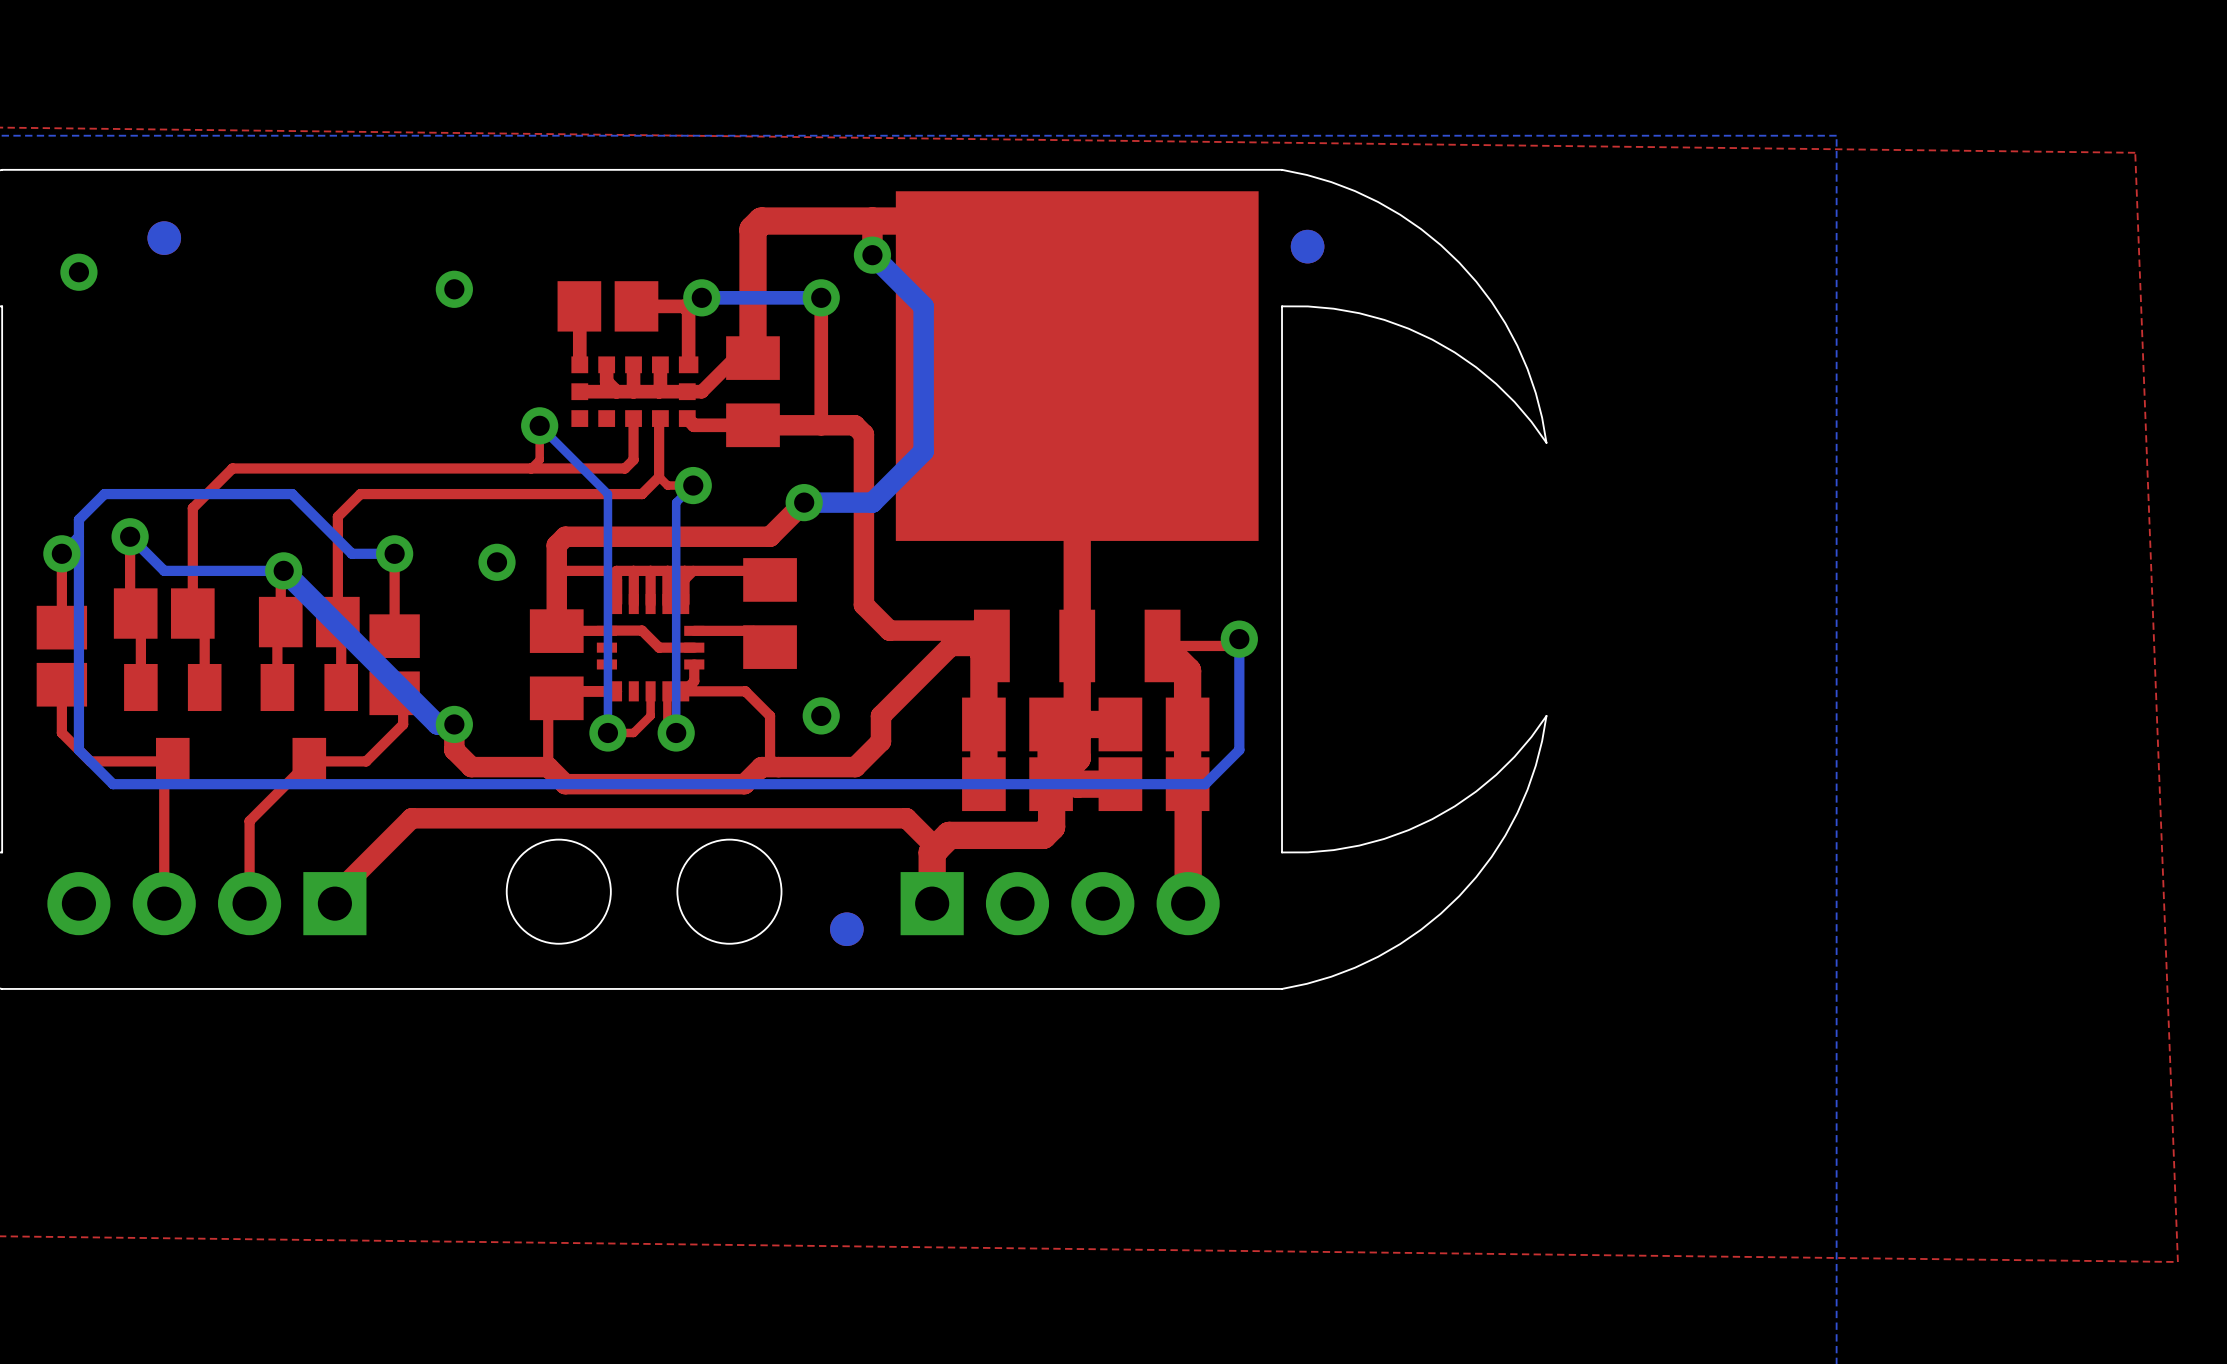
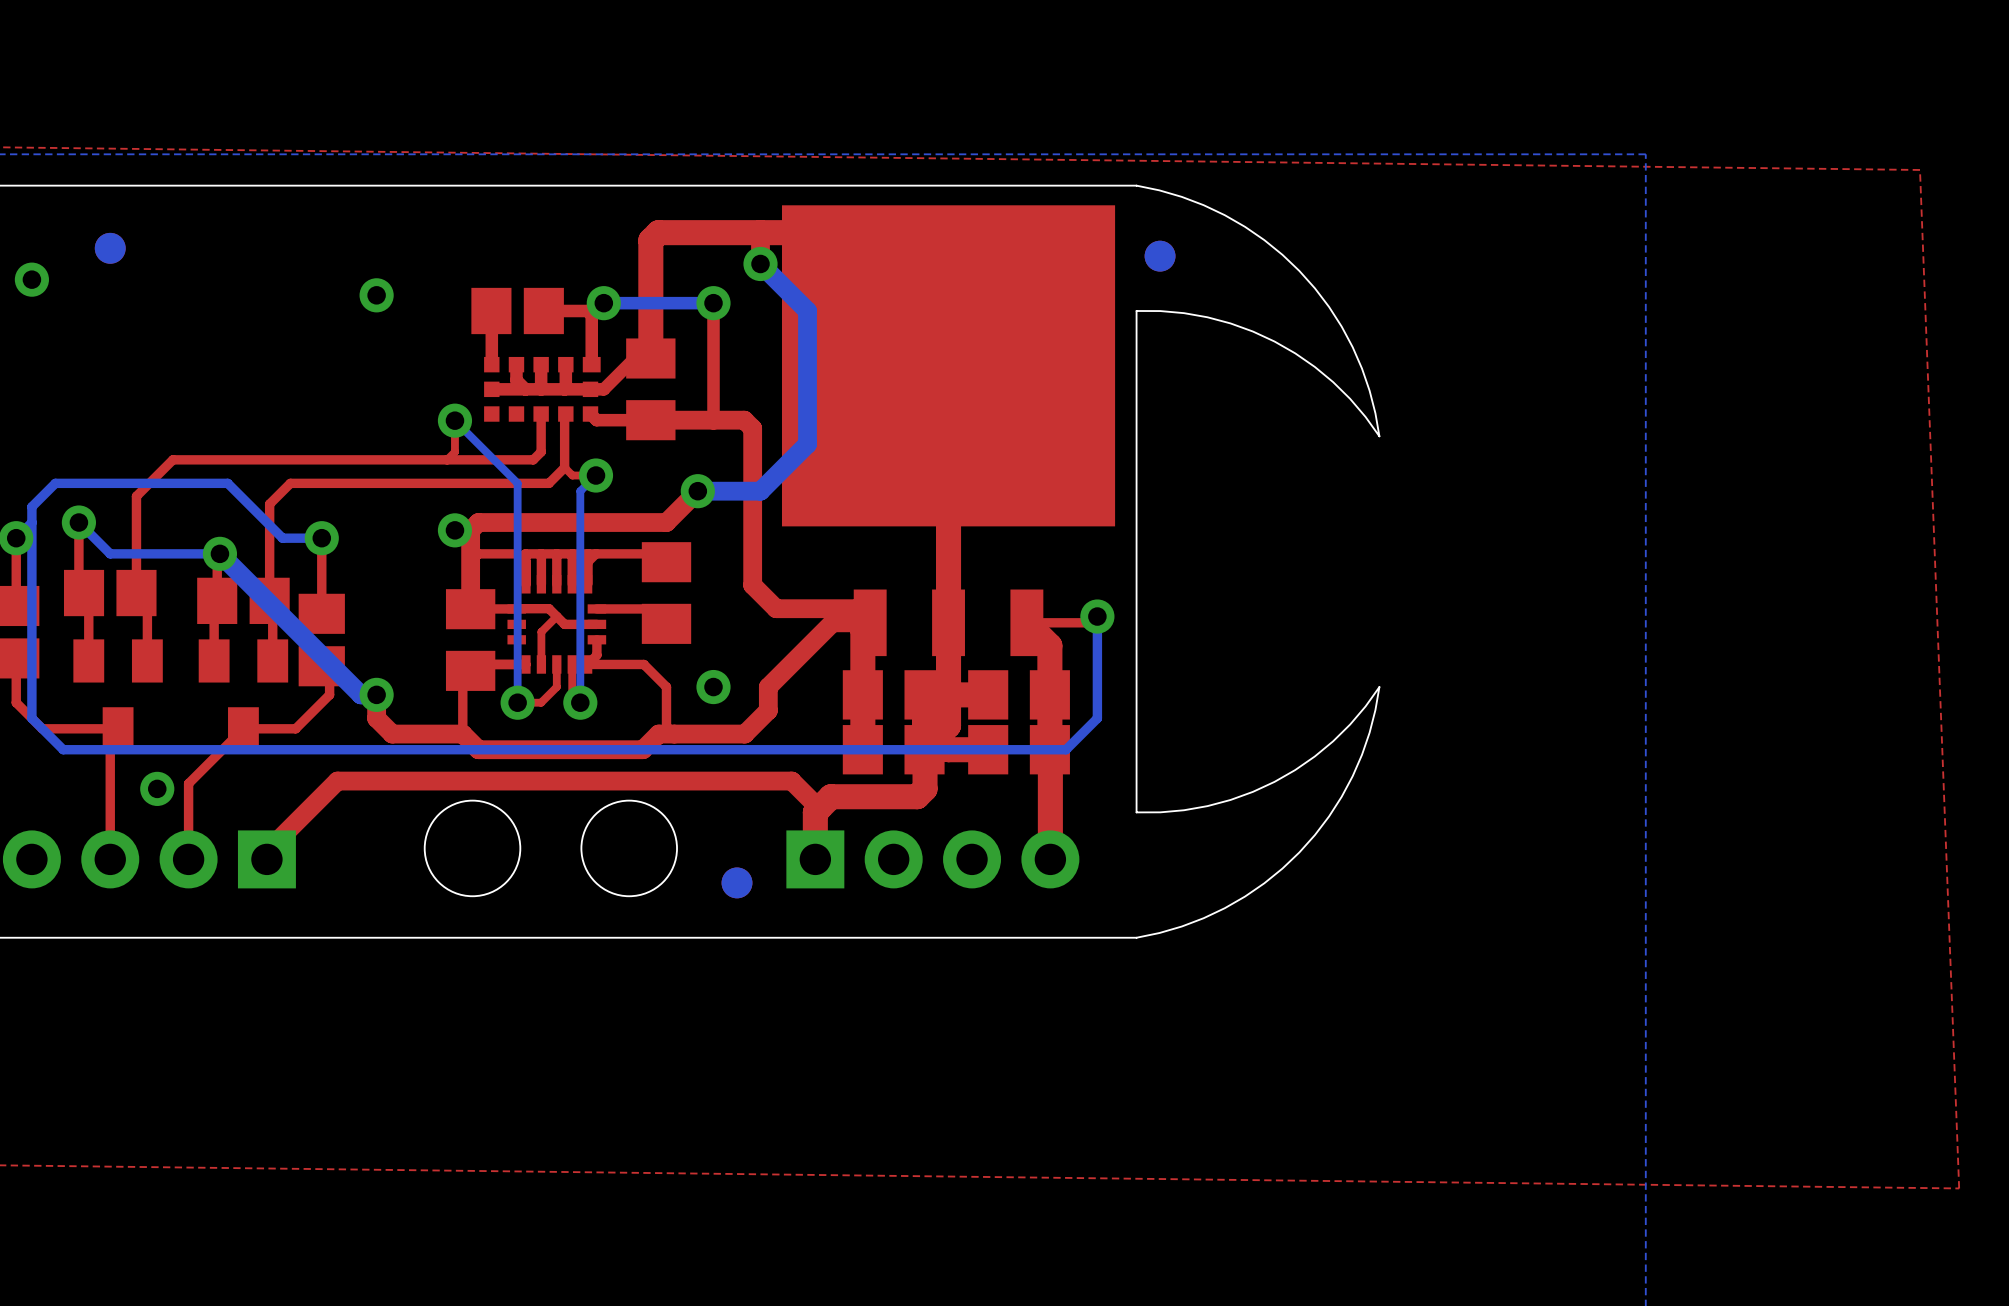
via position: (497, 562) -> (454, 530)
top track: none -> (556, 616) (541, 631) (541, 664)
via: none -> (157, 788)

